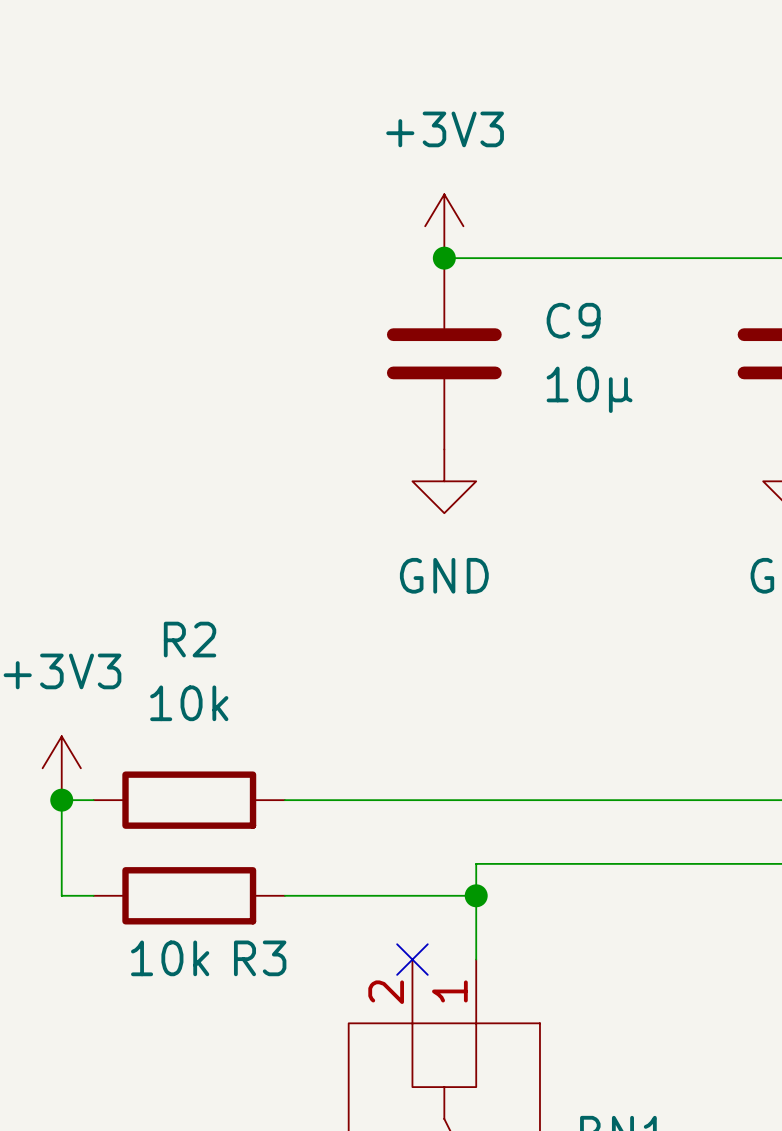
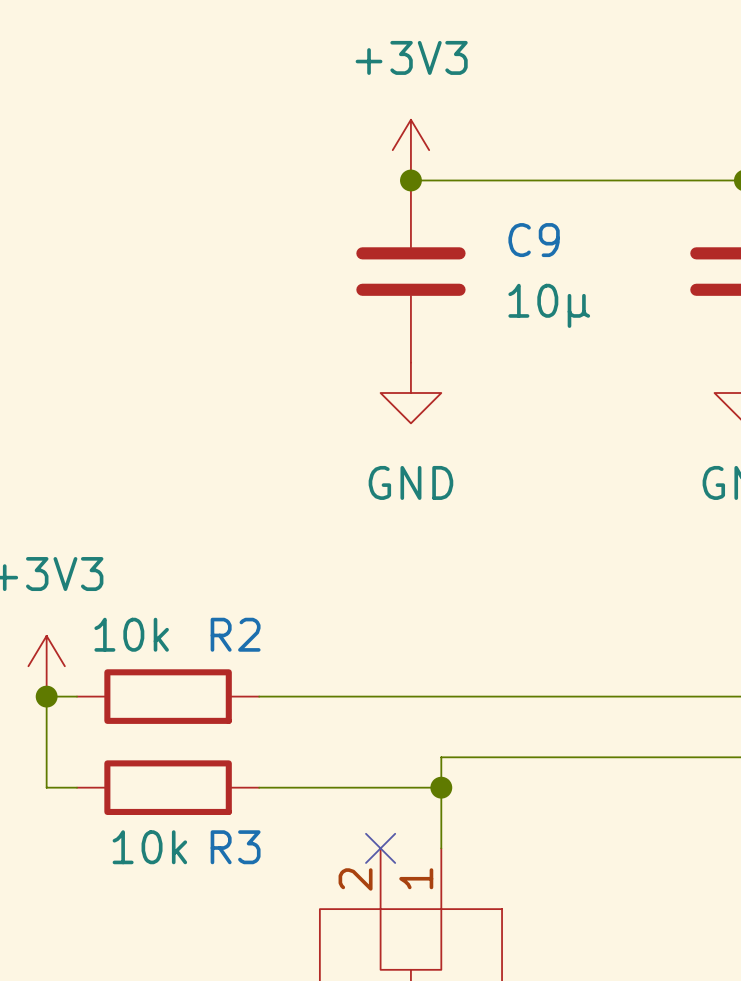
R2 name position: R2 (190, 639) -> R2 (235, 634)
R2 value position: 10k (189, 703) -> 10k (131, 634)

